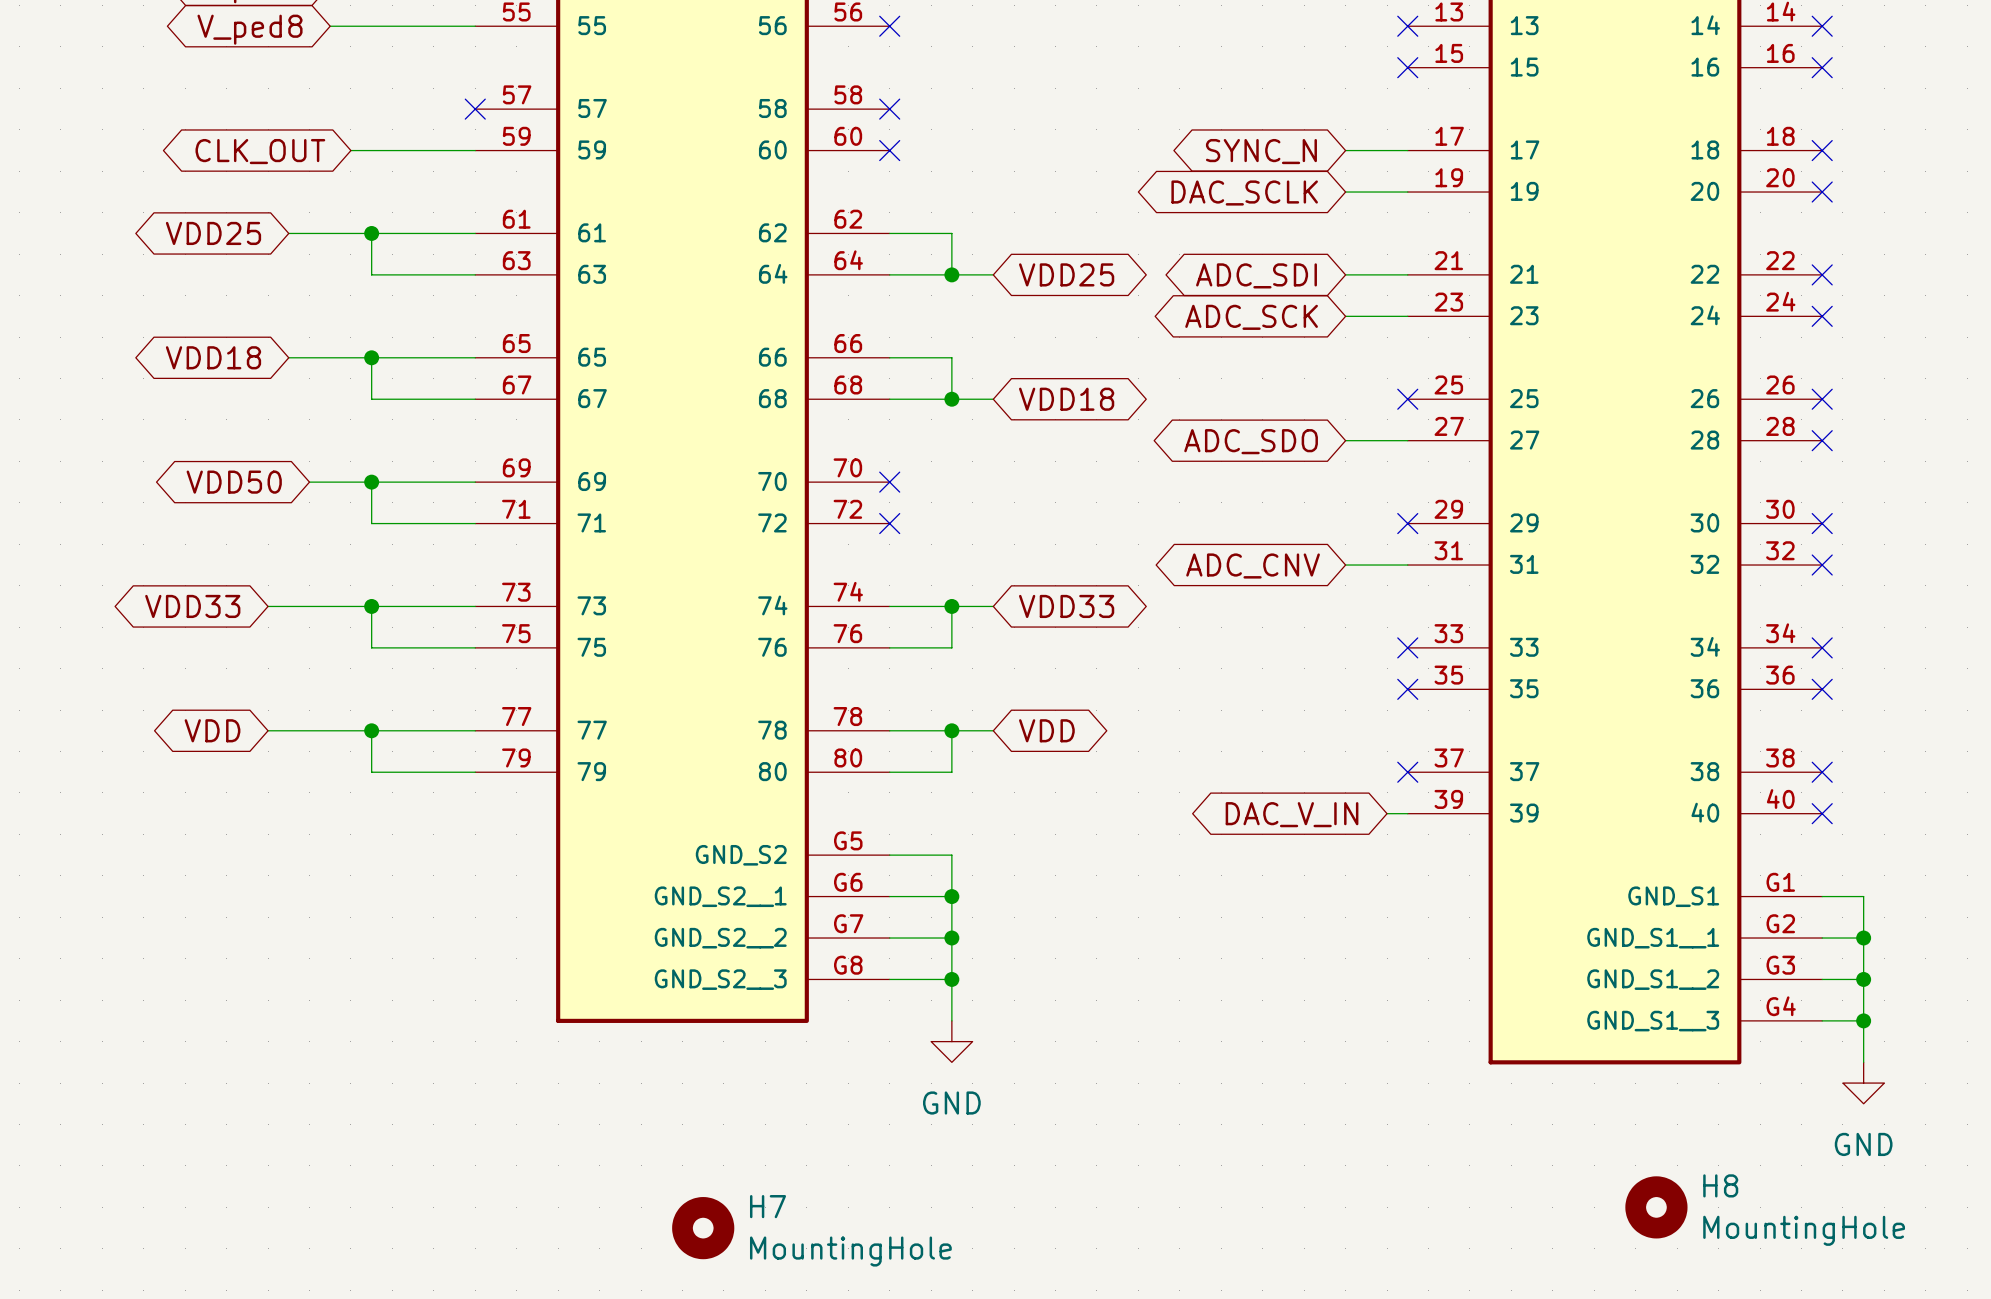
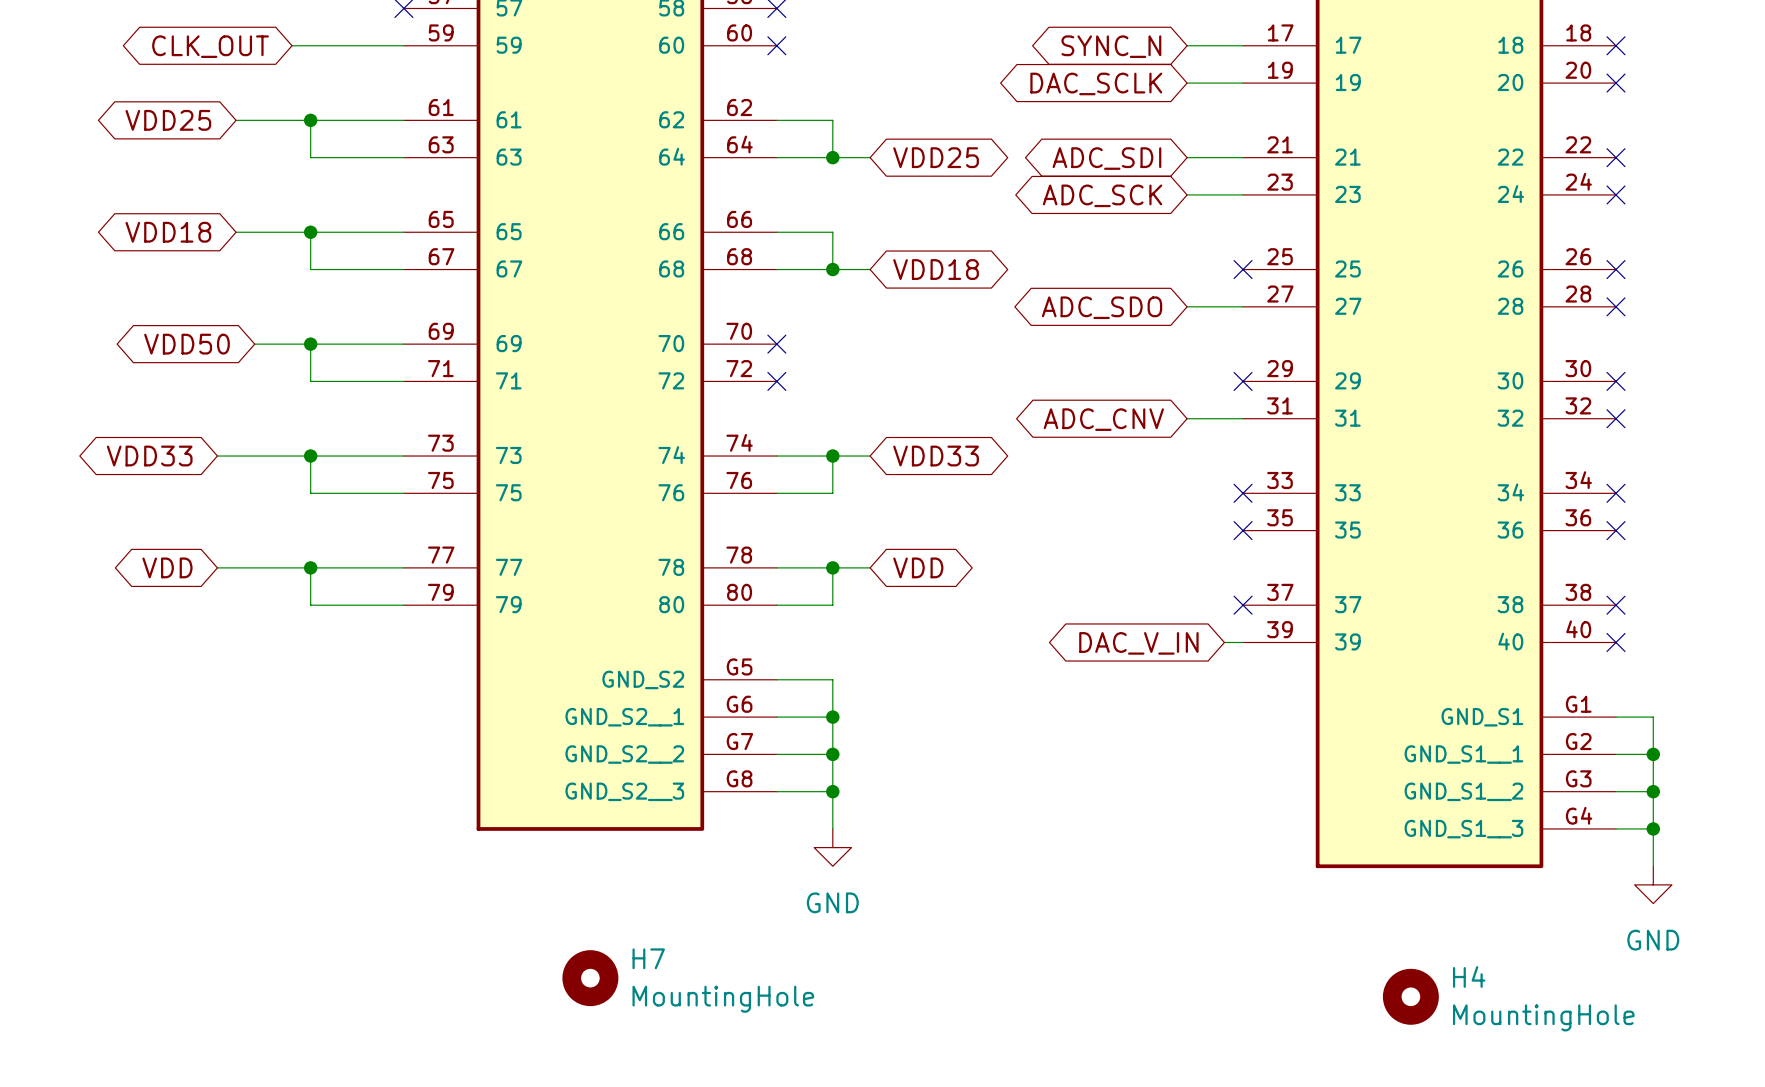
H4: none -> MountingHole (1410, 996)
H8: MountingHole (1656, 1207) -> none
H7 position: (703, 1228) -> (590, 978)

